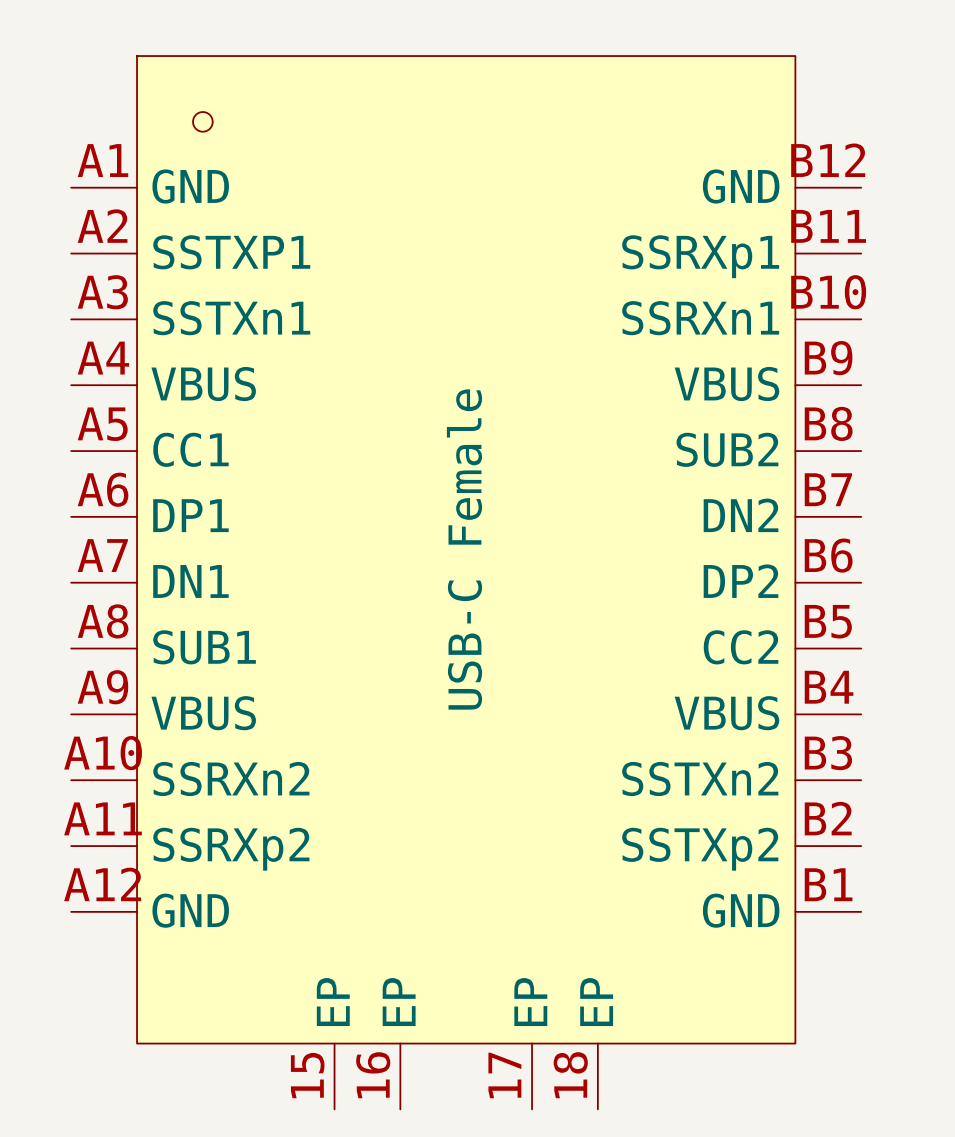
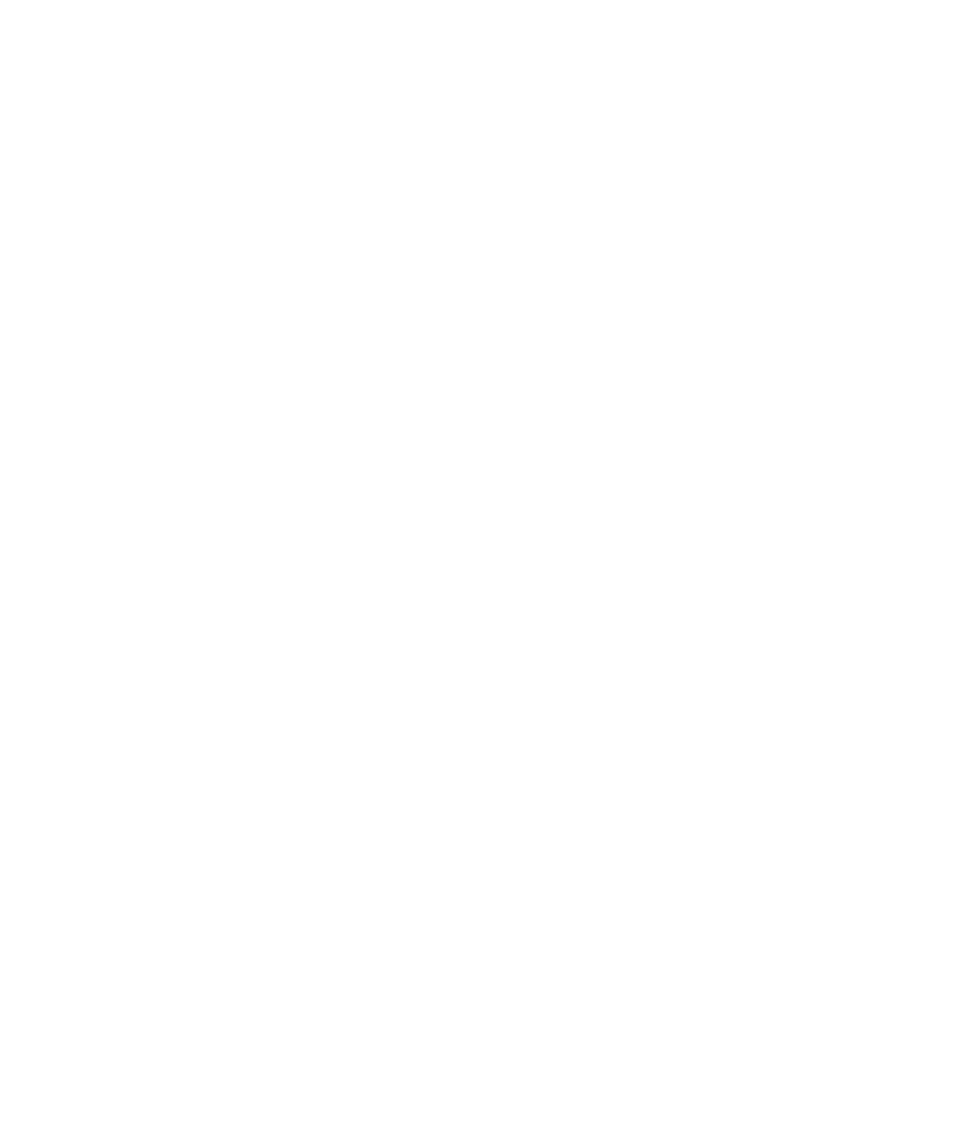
part: USB-C Female (466, 582) -> none

